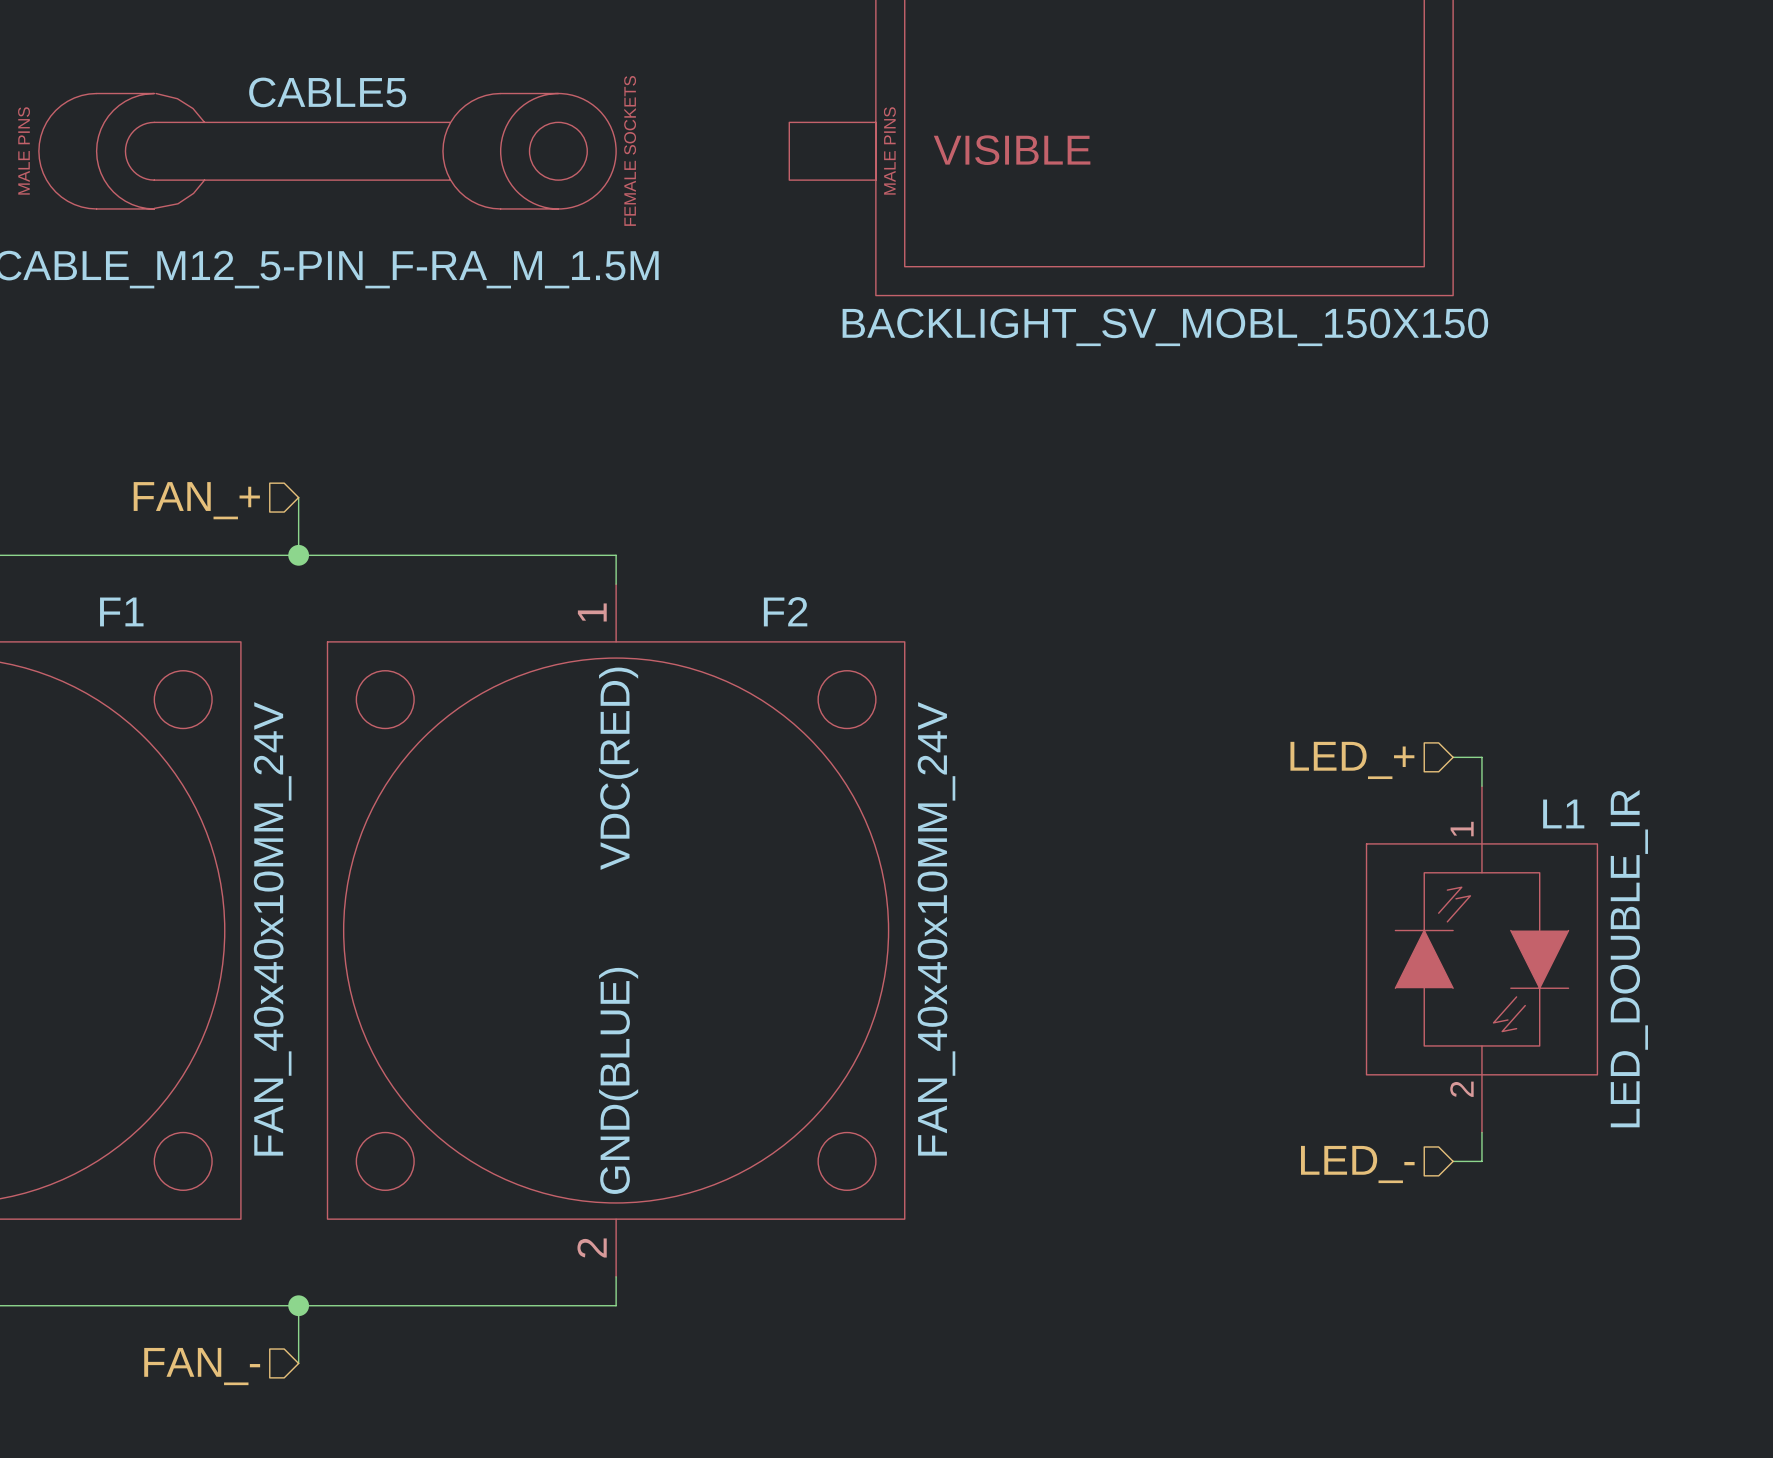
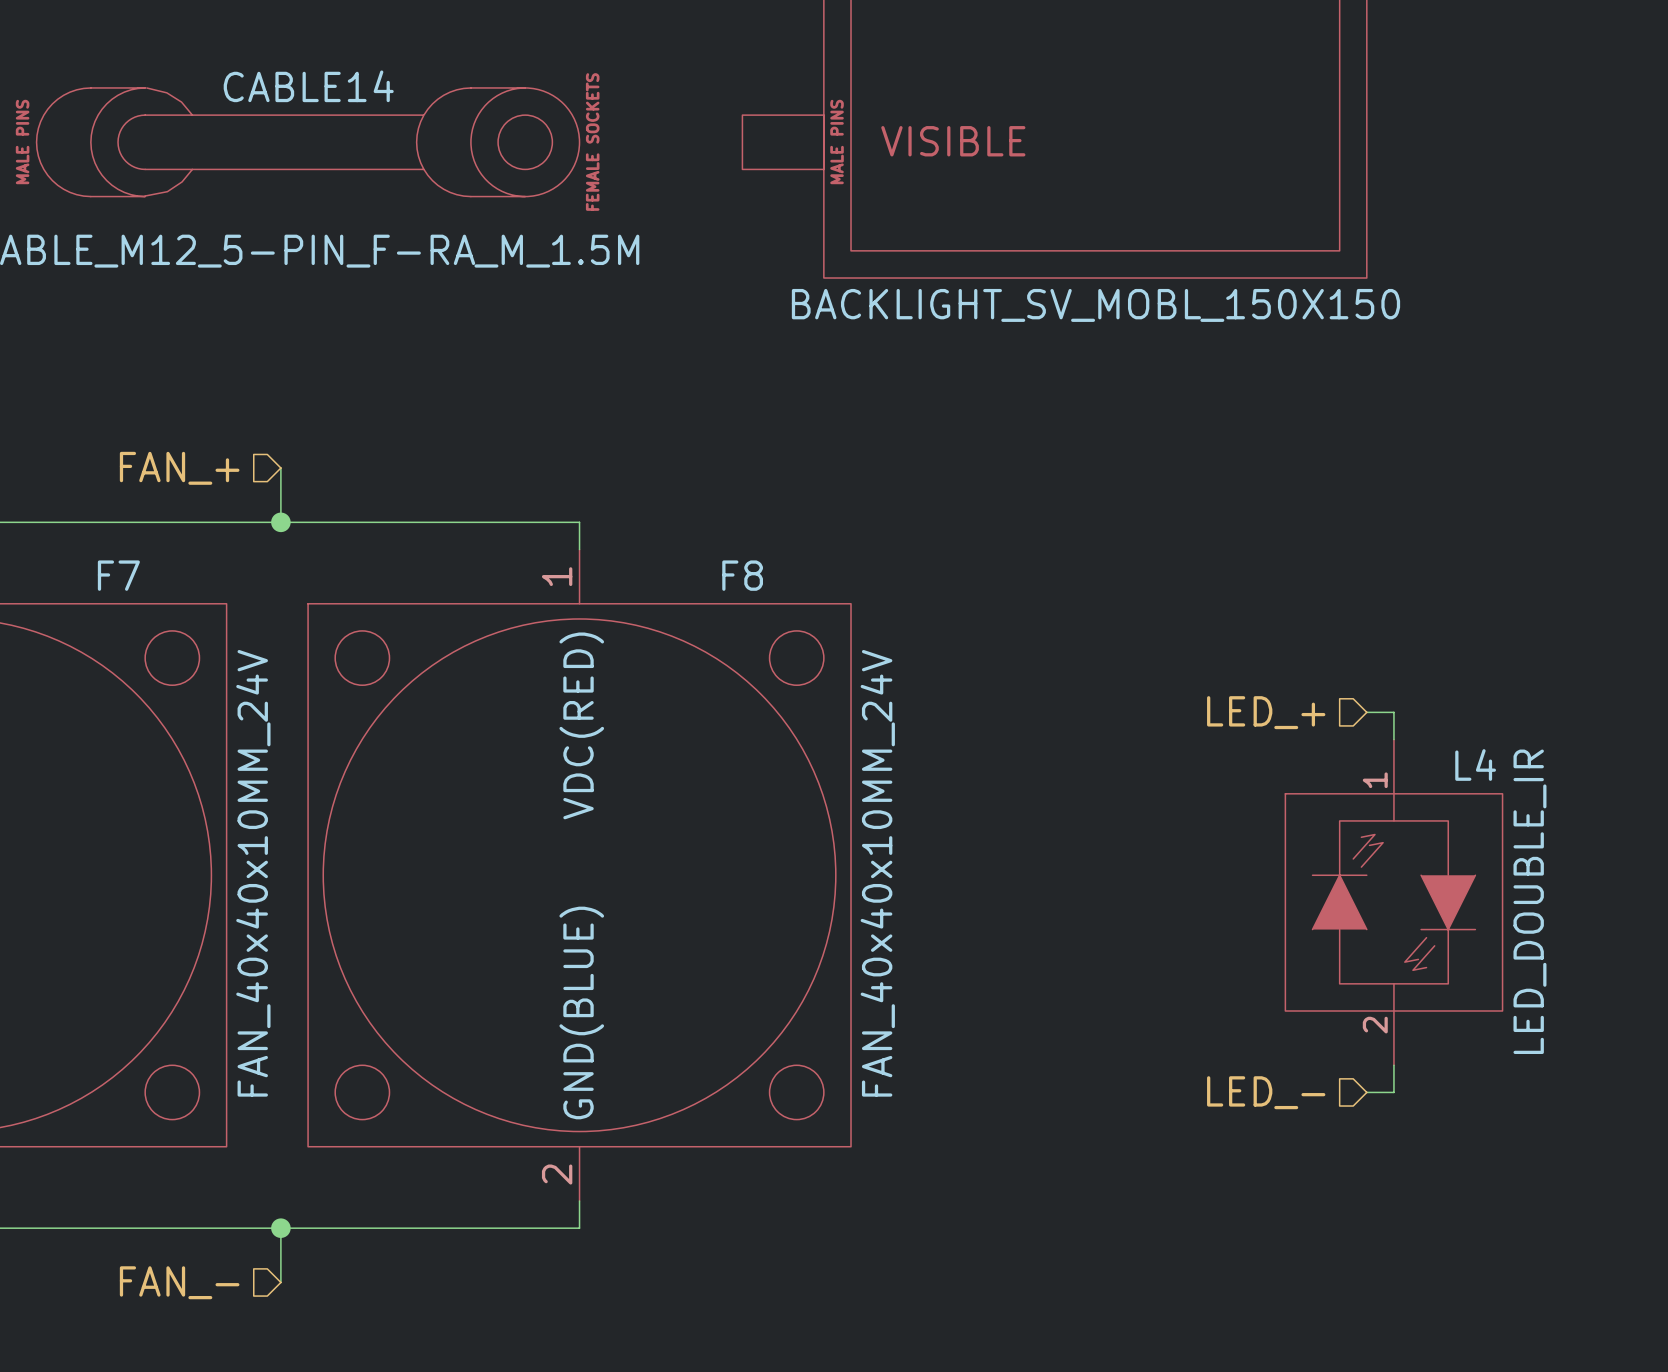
CABLE5 name: CABLE5 (327, 92) -> CABLE14 (308, 86)
F1 name: F1 (121, 611) -> F7 (118, 575)
F2 name: F2 (785, 611) -> F8 (742, 575)
L1 name: L1 (1563, 813) -> L4 (1475, 765)

